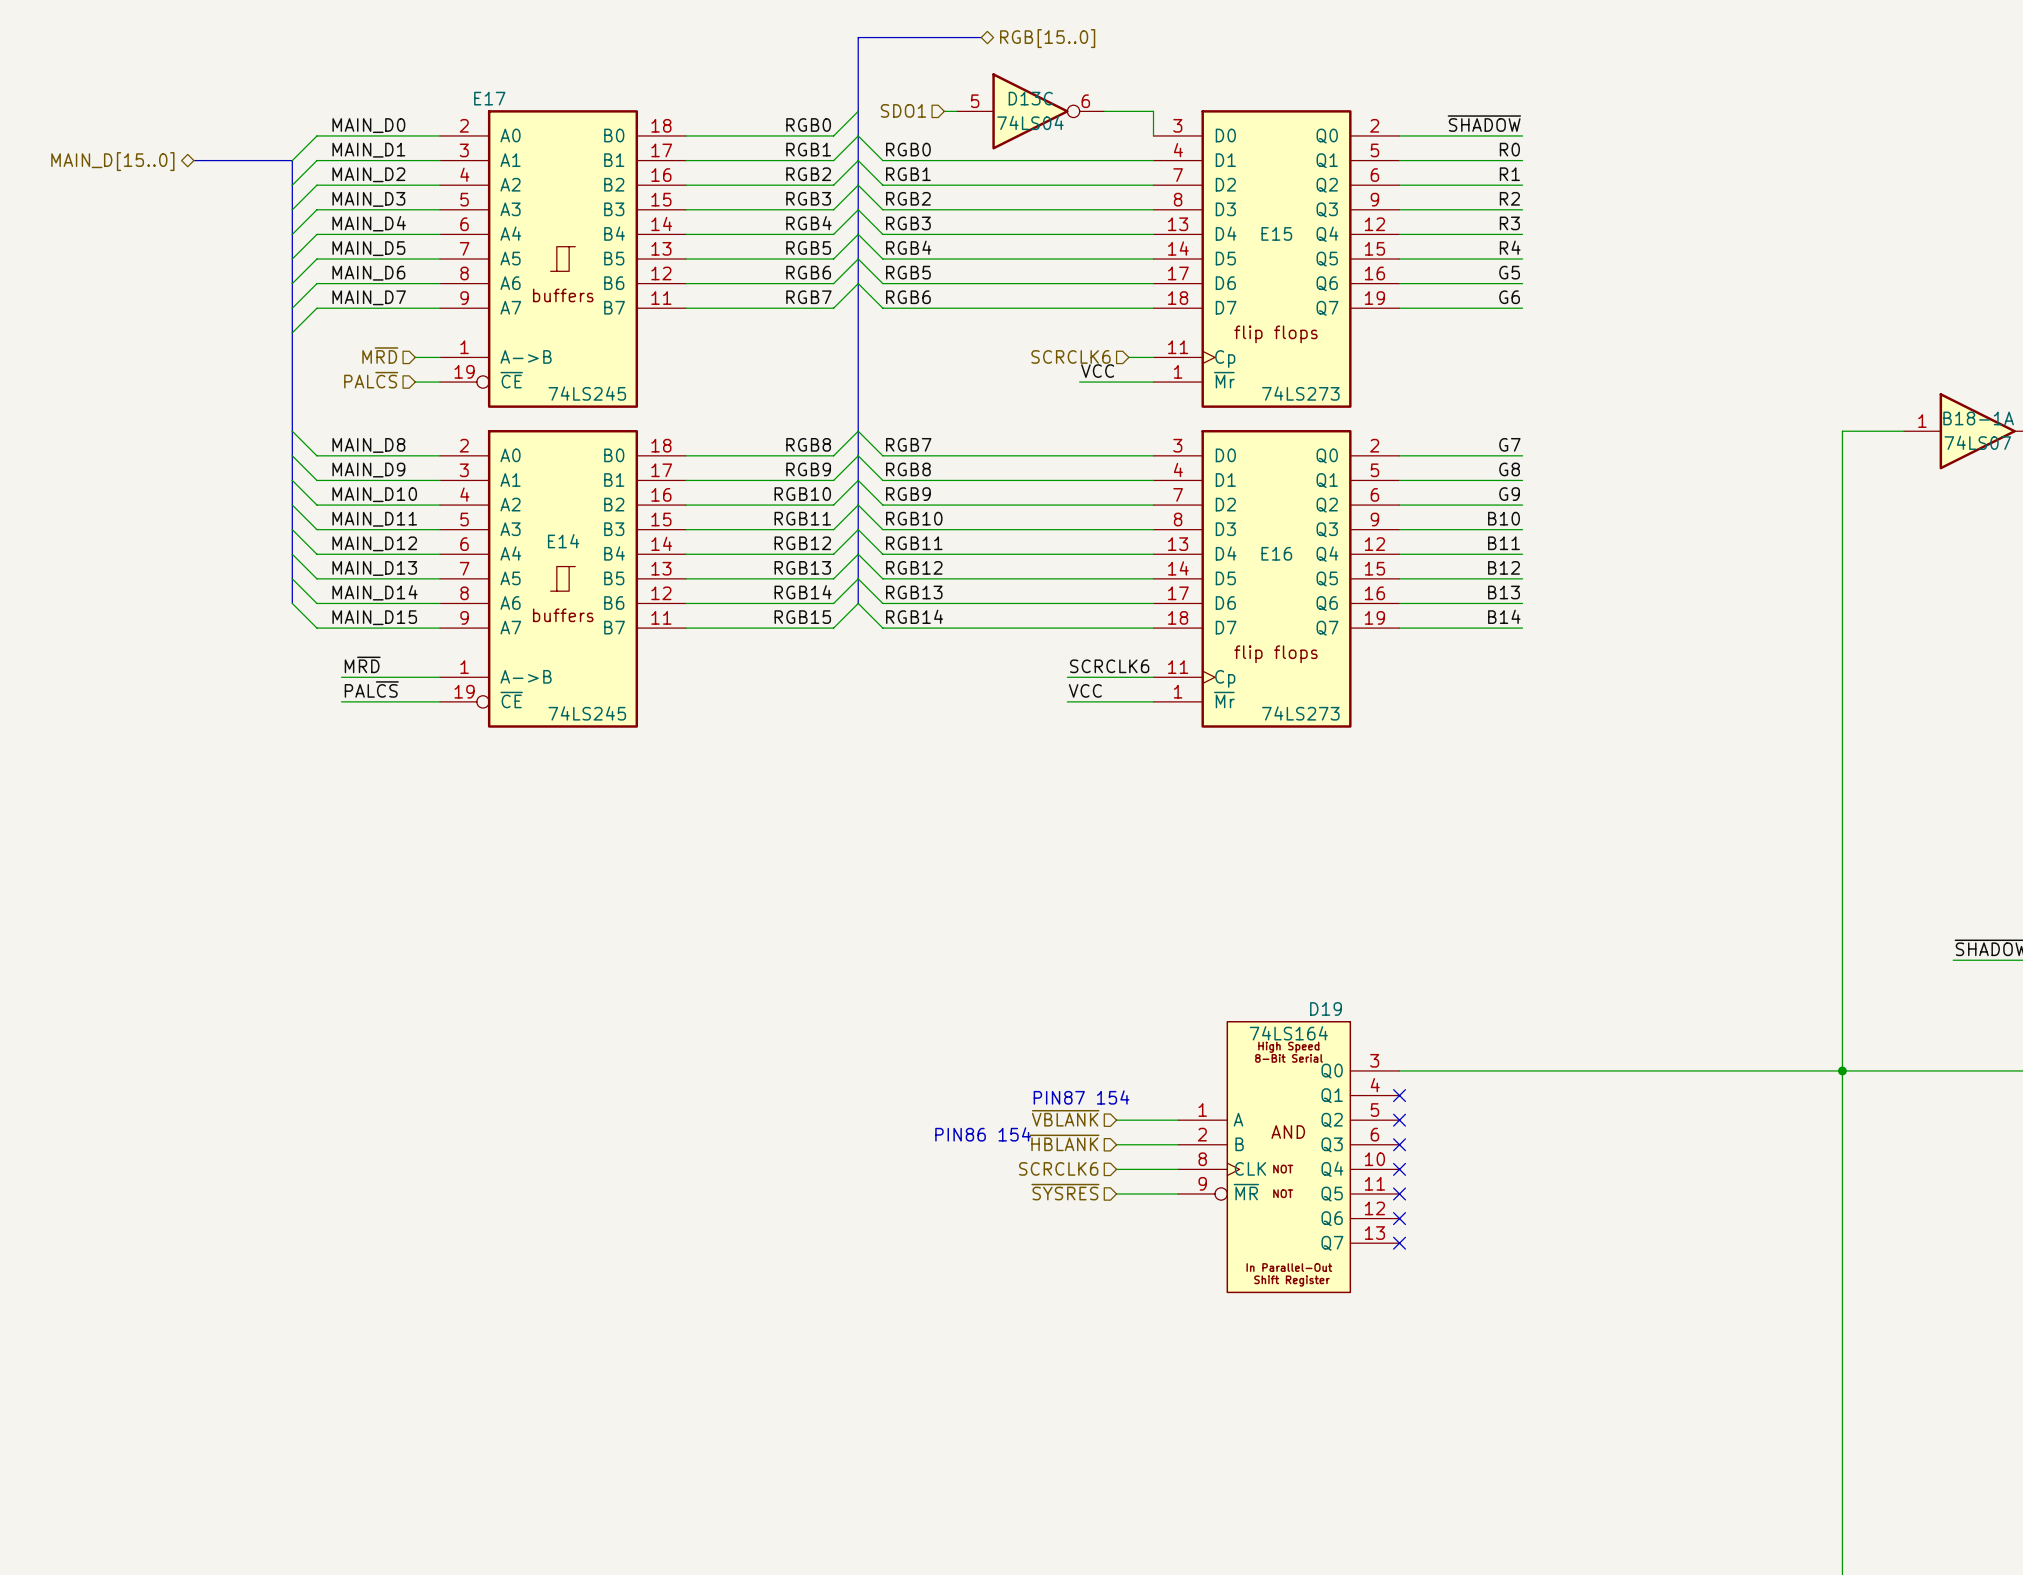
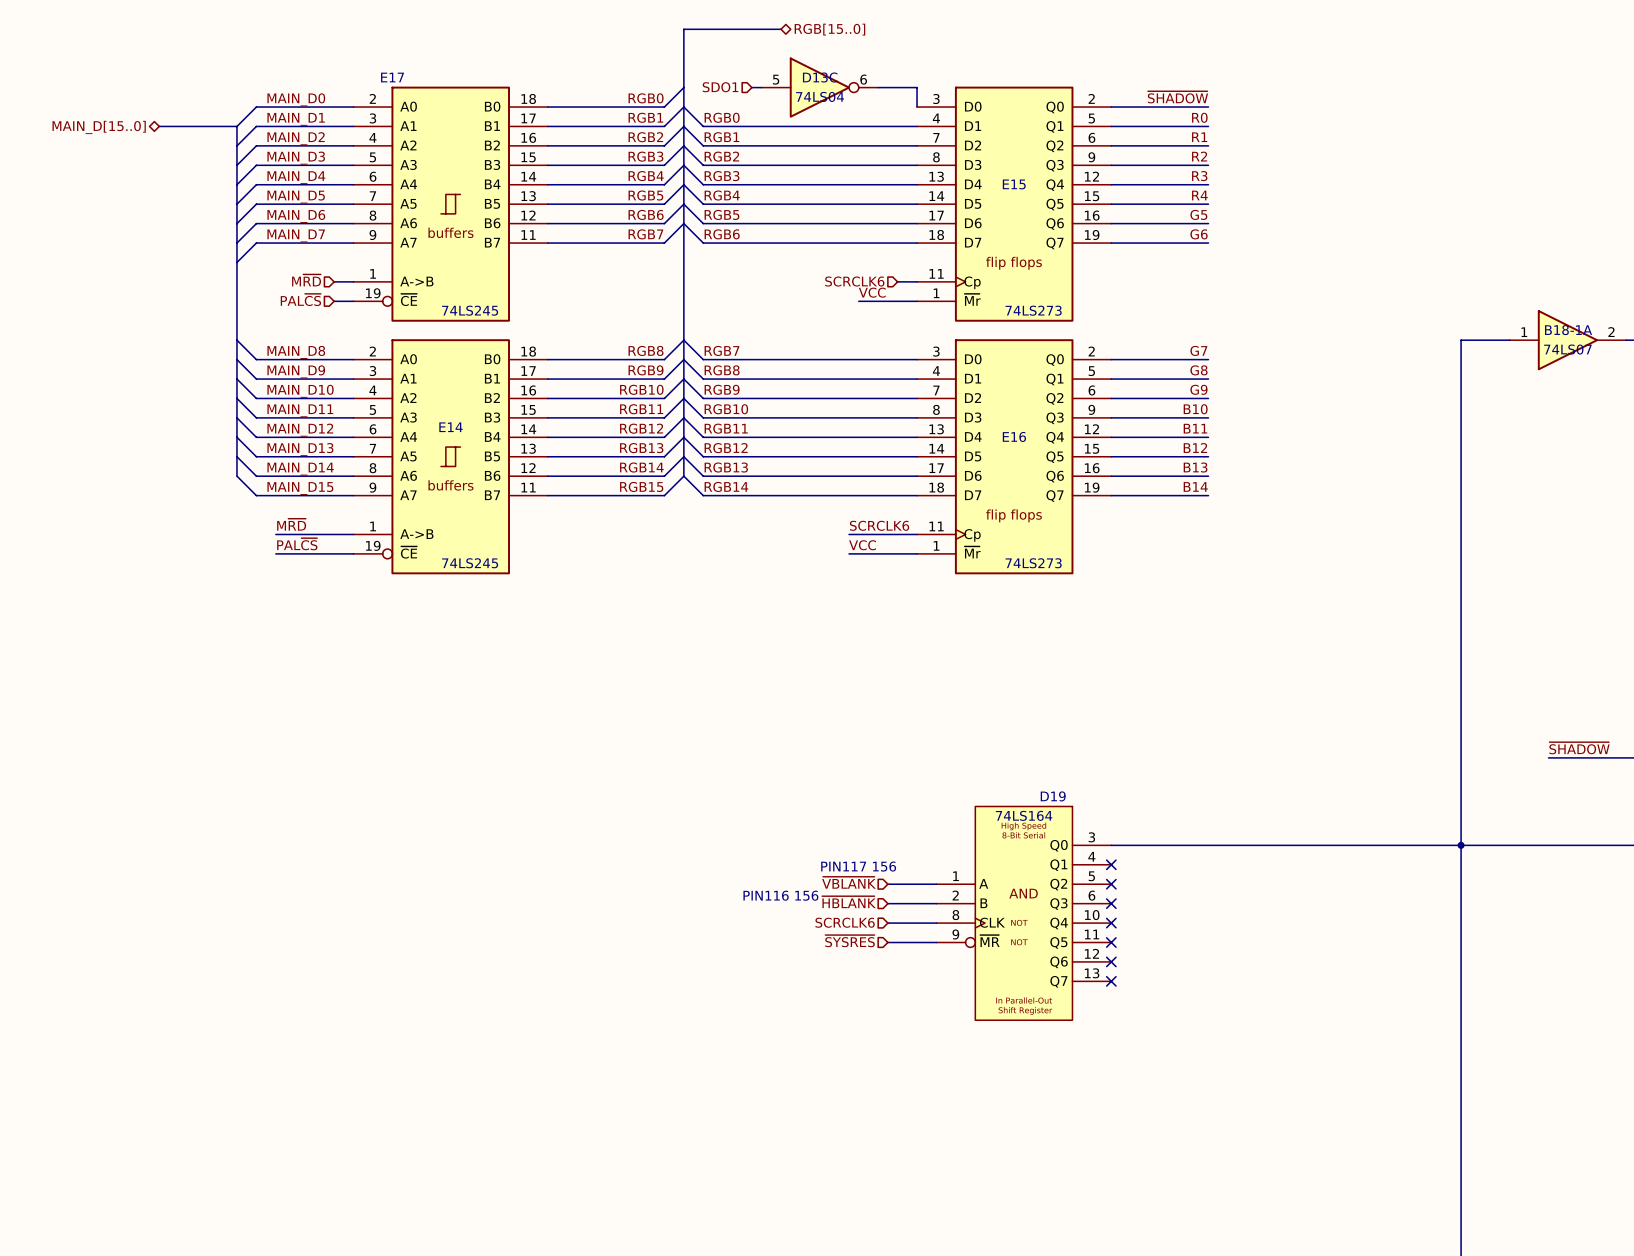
text: PIN87 154 (1081, 1097) -> PIN117 156 (858, 866)
text: PIN86 154 (983, 1134) -> PIN116 156 (780, 895)

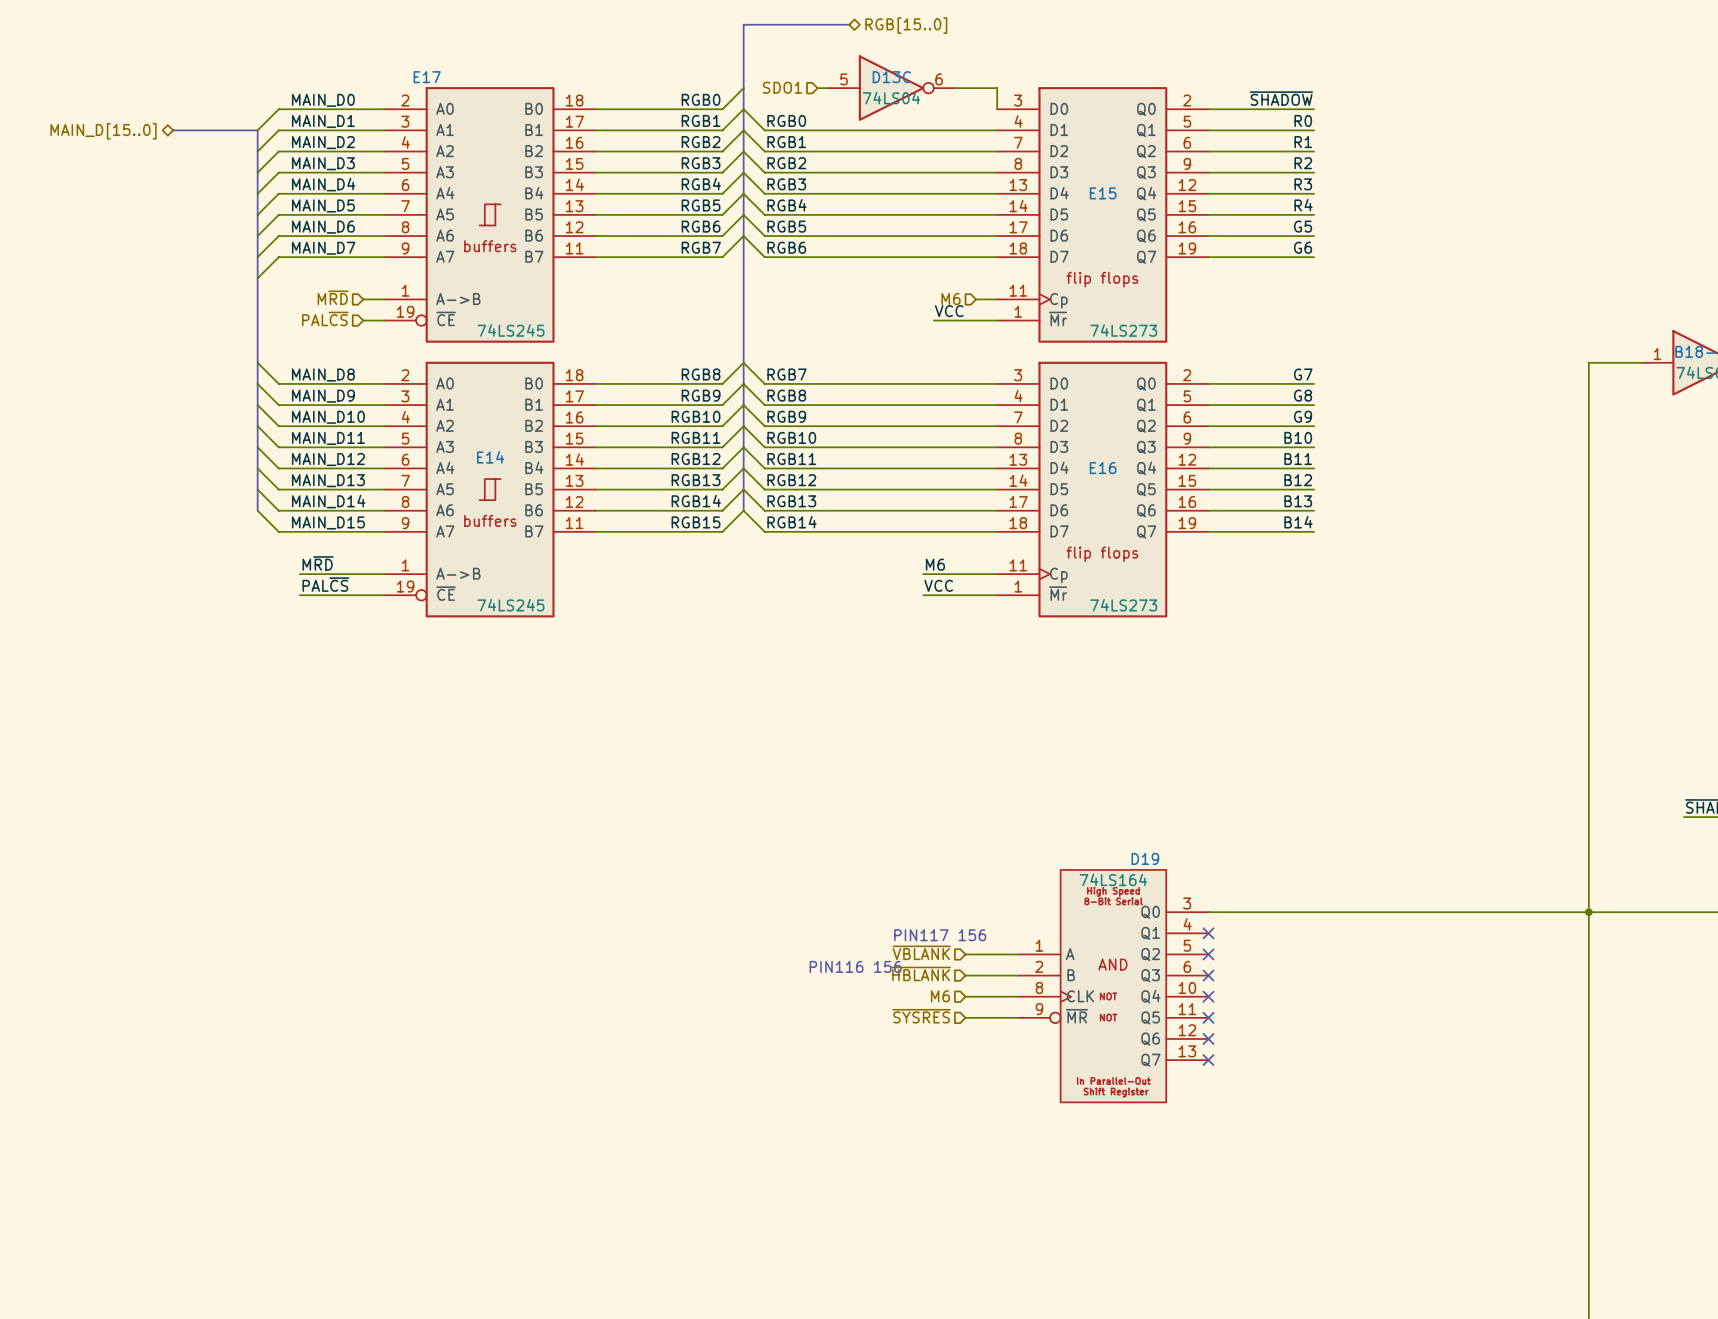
hierarchical label: SCRCLK6 (854, 281) -> M6 (951, 299)
label: SCRCLK6 (879, 525) -> M6 (935, 564)
hierarchical label: SCRCLK6 (845, 922) -> M6 (940, 996)

